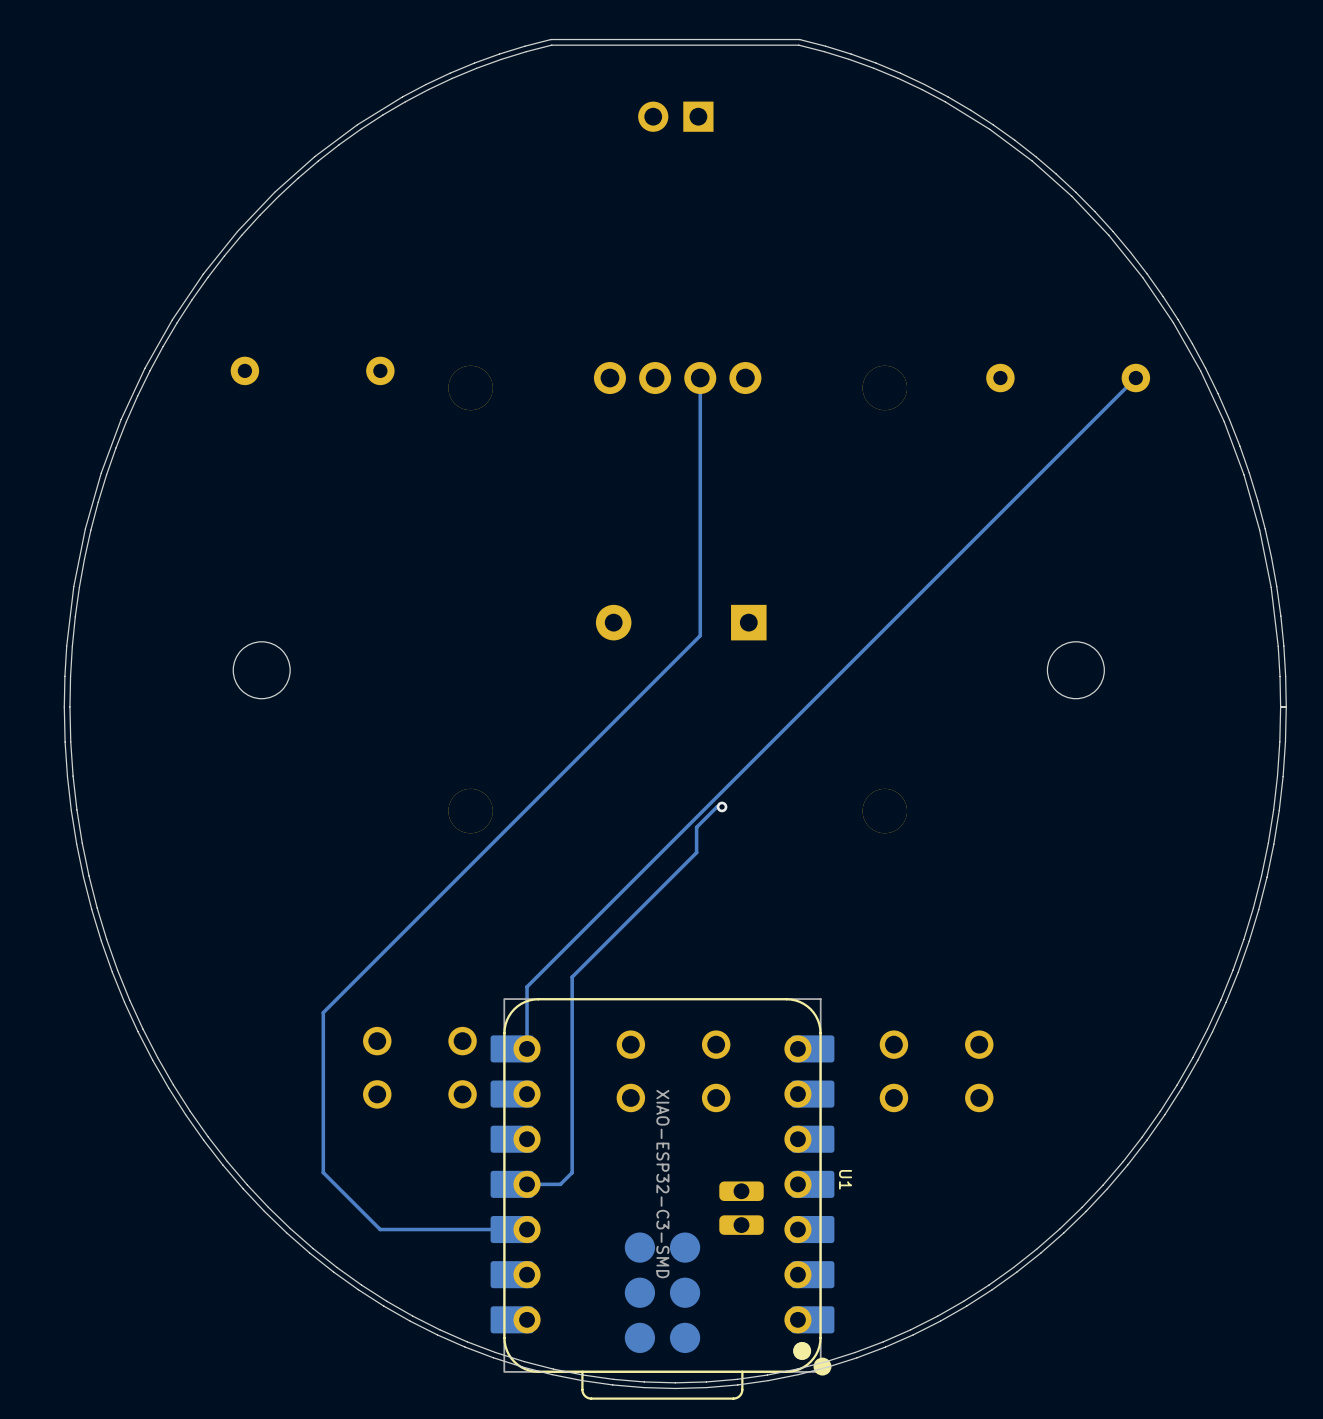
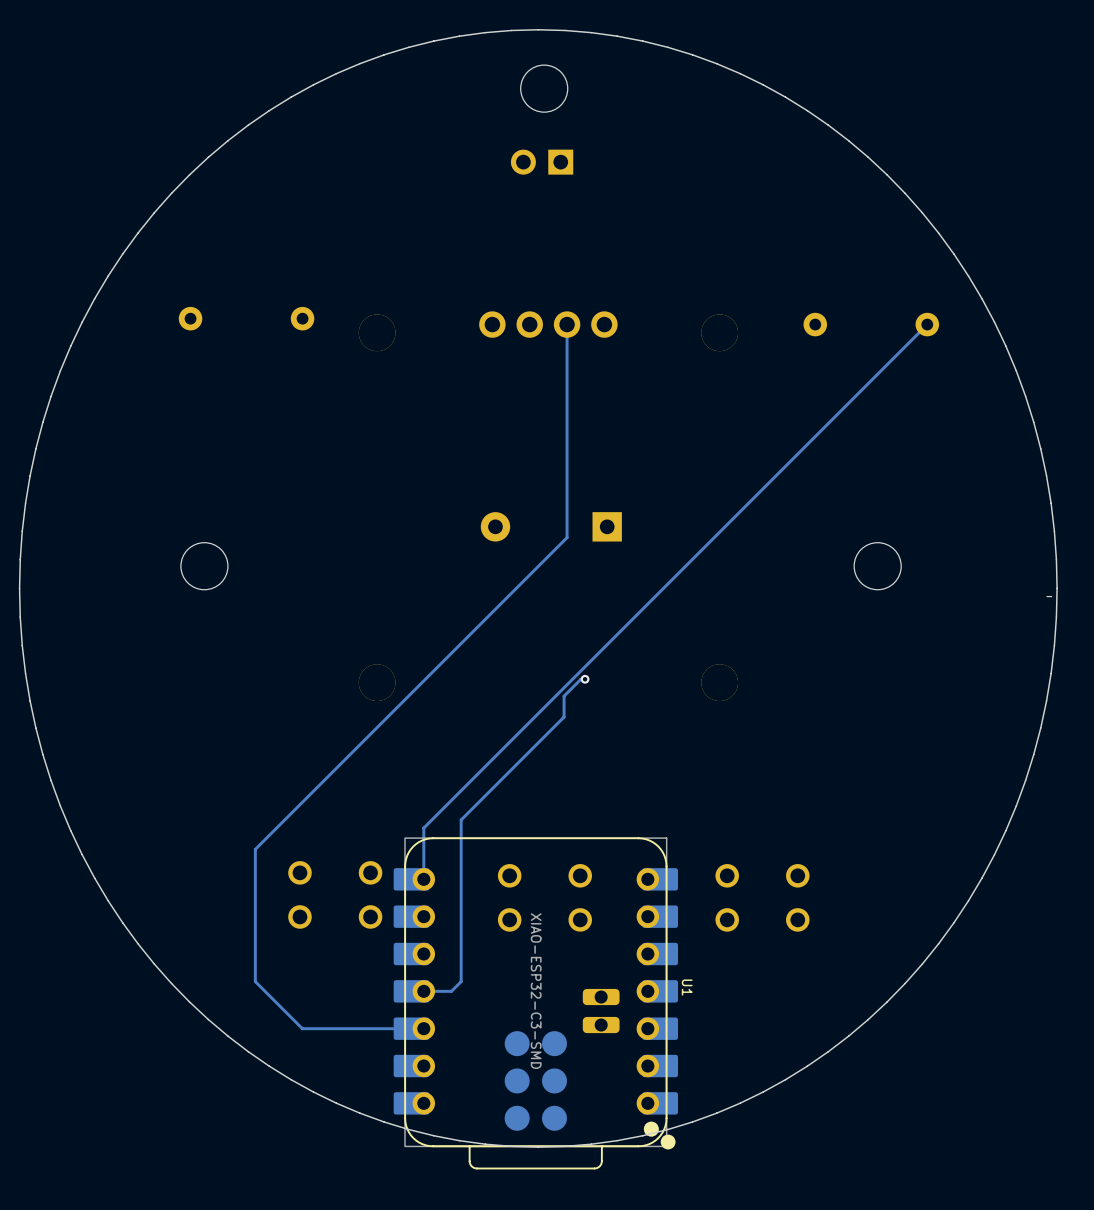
board edge: (799, 39) (851, 54) (900, 73) (947, 96) (993, 124) (1035, 156) (1075, 192) (1130, 252) (1163, 296) (1205, 368) (1229, 419) (1249, 473) (1265, 528) (1276, 586) (1283, 646) (1286, 706) (1283, 776) (1279, 810) (1267, 877) (1249, 941) (1226, 1002) (1197, 1060) (1164, 1114) (1127, 1165) (1086, 1211) (1040, 1252) (992, 1289) (940, 1321) (885, 1347) (828, 1367) (768, 1380) (706, 1387) (675, 1388) (643, 1387) (582, 1380) (522, 1367) (465, 1347) (410, 1321) (358, 1289) (309, 1252) (264, 1211) (222, 1165) (185, 1114) (152, 1060) (124, 1002) (101, 941) (83, 877) (71, 810) (67, 776) (64, 706) (66, 646) (73, 586) (85, 528) (101, 473) (121, 419) (144, 368) (172, 319) (203, 274) (237, 231) (274, 192) (314, 156) (357, 124) (402, 96) (450, 73) (499, 54) (550, 39) -> none
board edge: (799, 39) (551, 39) -> none
board edge: (798, 45) (551, 45) (501, 59) (452, 78) (405, 101) (339, 144) (298, 178) (241, 235) (192, 299) (163, 346) (126, 421) (106, 474) (90, 530) (79, 587) (70, 676) (70, 741) (76, 809) (89, 875) (106, 939) (129, 1000) (157, 1057) (190, 1111) (227, 1161) (268, 1207) (313, 1248) (361, 1285) (412, 1316) (467, 1341) (524, 1361) (583, 1375) (644, 1381) (675, 1382) (737, 1379) (797, 1369) (855, 1352) (910, 1329) (963, 1301) (1013, 1267) (1060, 1228) (1103, 1184) (1142, 1136) (1177, 1084) (1207, 1029) (1233, 970) (1253, 908) (1268, 843) (1277, 776) (1280, 706) (1278, 646) (1271, 587) (1259, 530) (1243, 474) (1224, 421) (1200, 370) (1173, 322) (1142, 277) (1108, 235) (1071, 196) (1032, 161) (989, 129) (945, 101) (898, 78) (849, 59) (798, 45) -> (538, 29) (591, 32) (642, 41) (692, 54) (740, 73) (785, 97) (828, 125) (868, 157) (905, 193) (938, 233) (968, 276) (994, 322) (1016, 370) (1033, 422) (1046, 475) (1054, 531) (1057, 588) (1054, 645) (1046, 701) (1033, 754) (1016, 805) (994, 854) (968, 900) (938, 943) (905, 983) (868, 1019) (828, 1051) (785, 1079) (740, 1103) (692, 1121) (642, 1135) (591, 1144) (538, 1147) (485, 1144) (433, 1135) (384, 1121) (336, 1103) (291, 1079) (248, 1051) (208, 1019) (171, 983) (138, 943) (108, 900) (82, 854) (60, 805) (42, 754) (30, 701) (22, 645) (19, 588) (22, 531) (30, 475) (42, 422) (60, 370) (82, 322) (108, 276) (138, 233) (171, 193) (208, 157) (248, 125) (291, 97) (336, 73) (384, 54) (433, 41) (485, 32) (538, 29)
round board edge: none -> [520, 64, 569, 113]
part position: (675, 116) -> (542, 162)

